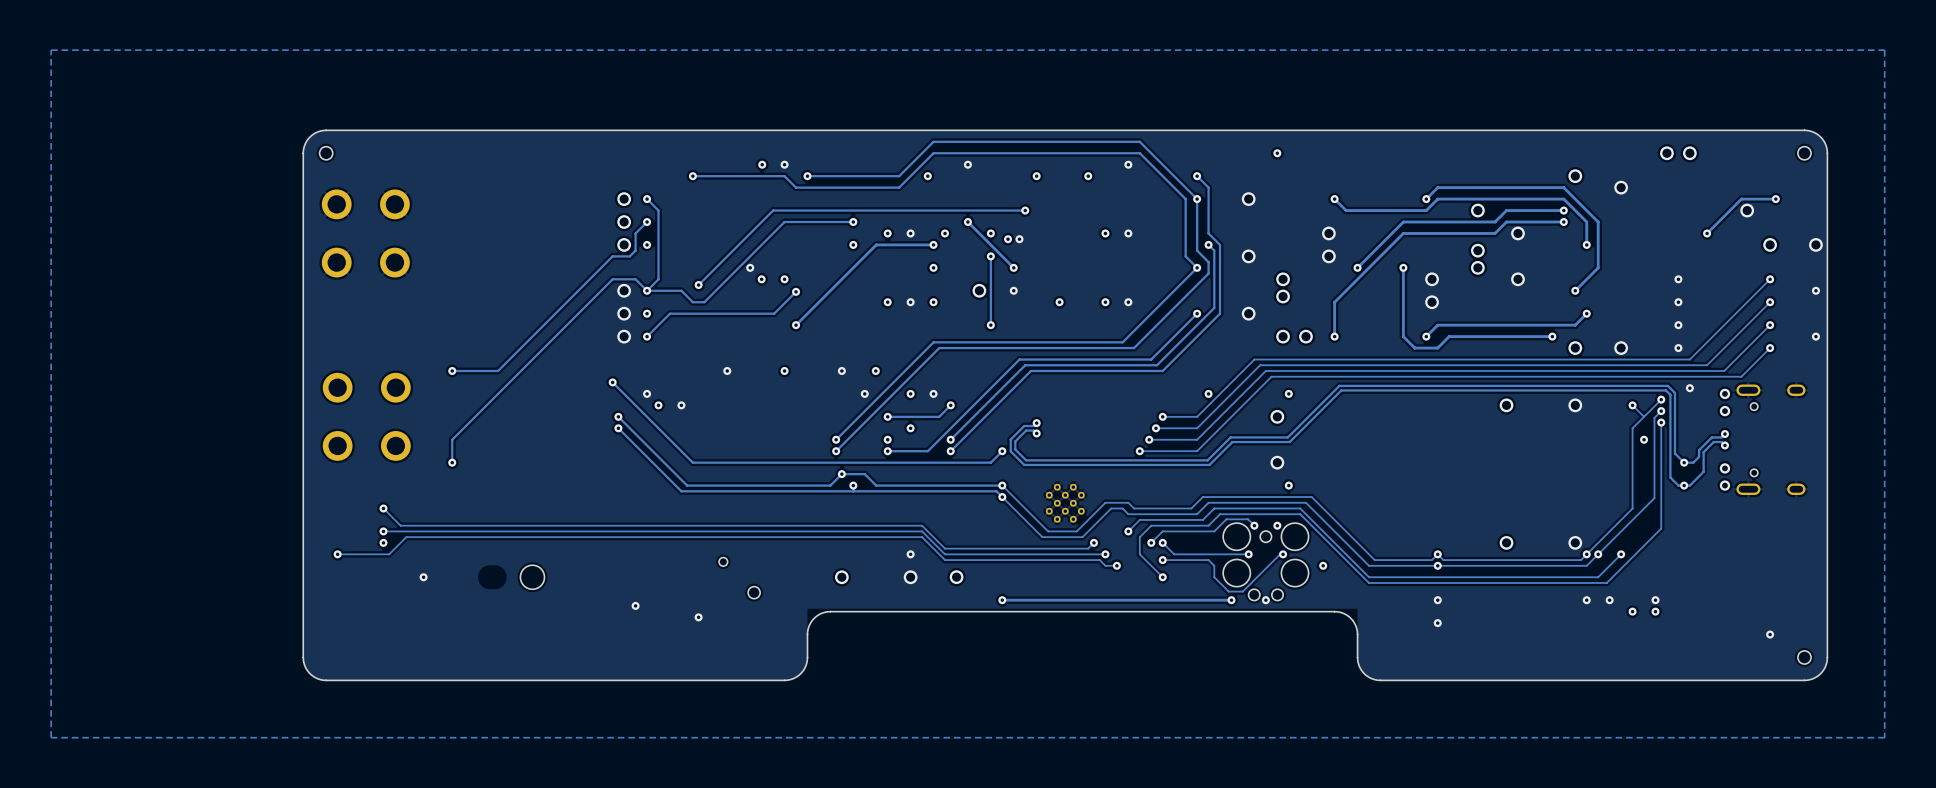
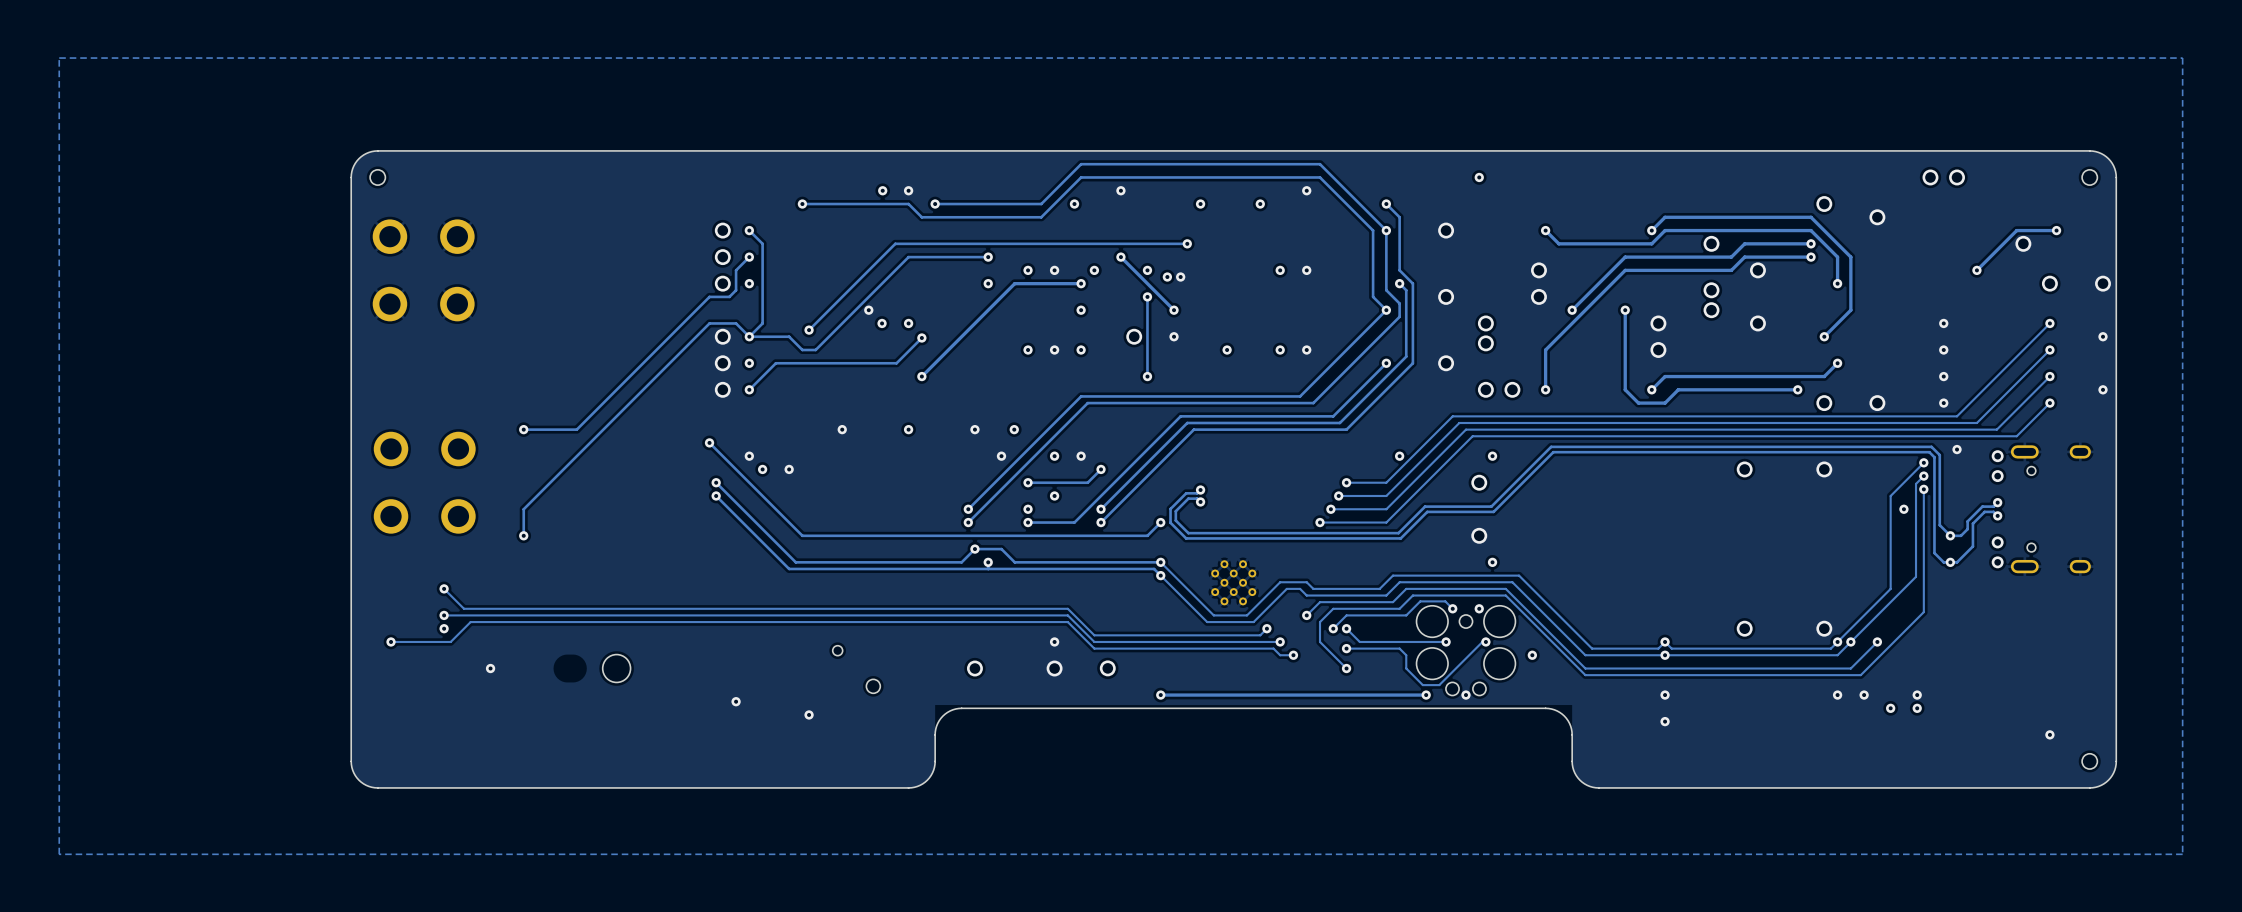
track: (1632, 405) (1644, 416) -> none
via: (1632, 405) -> none

